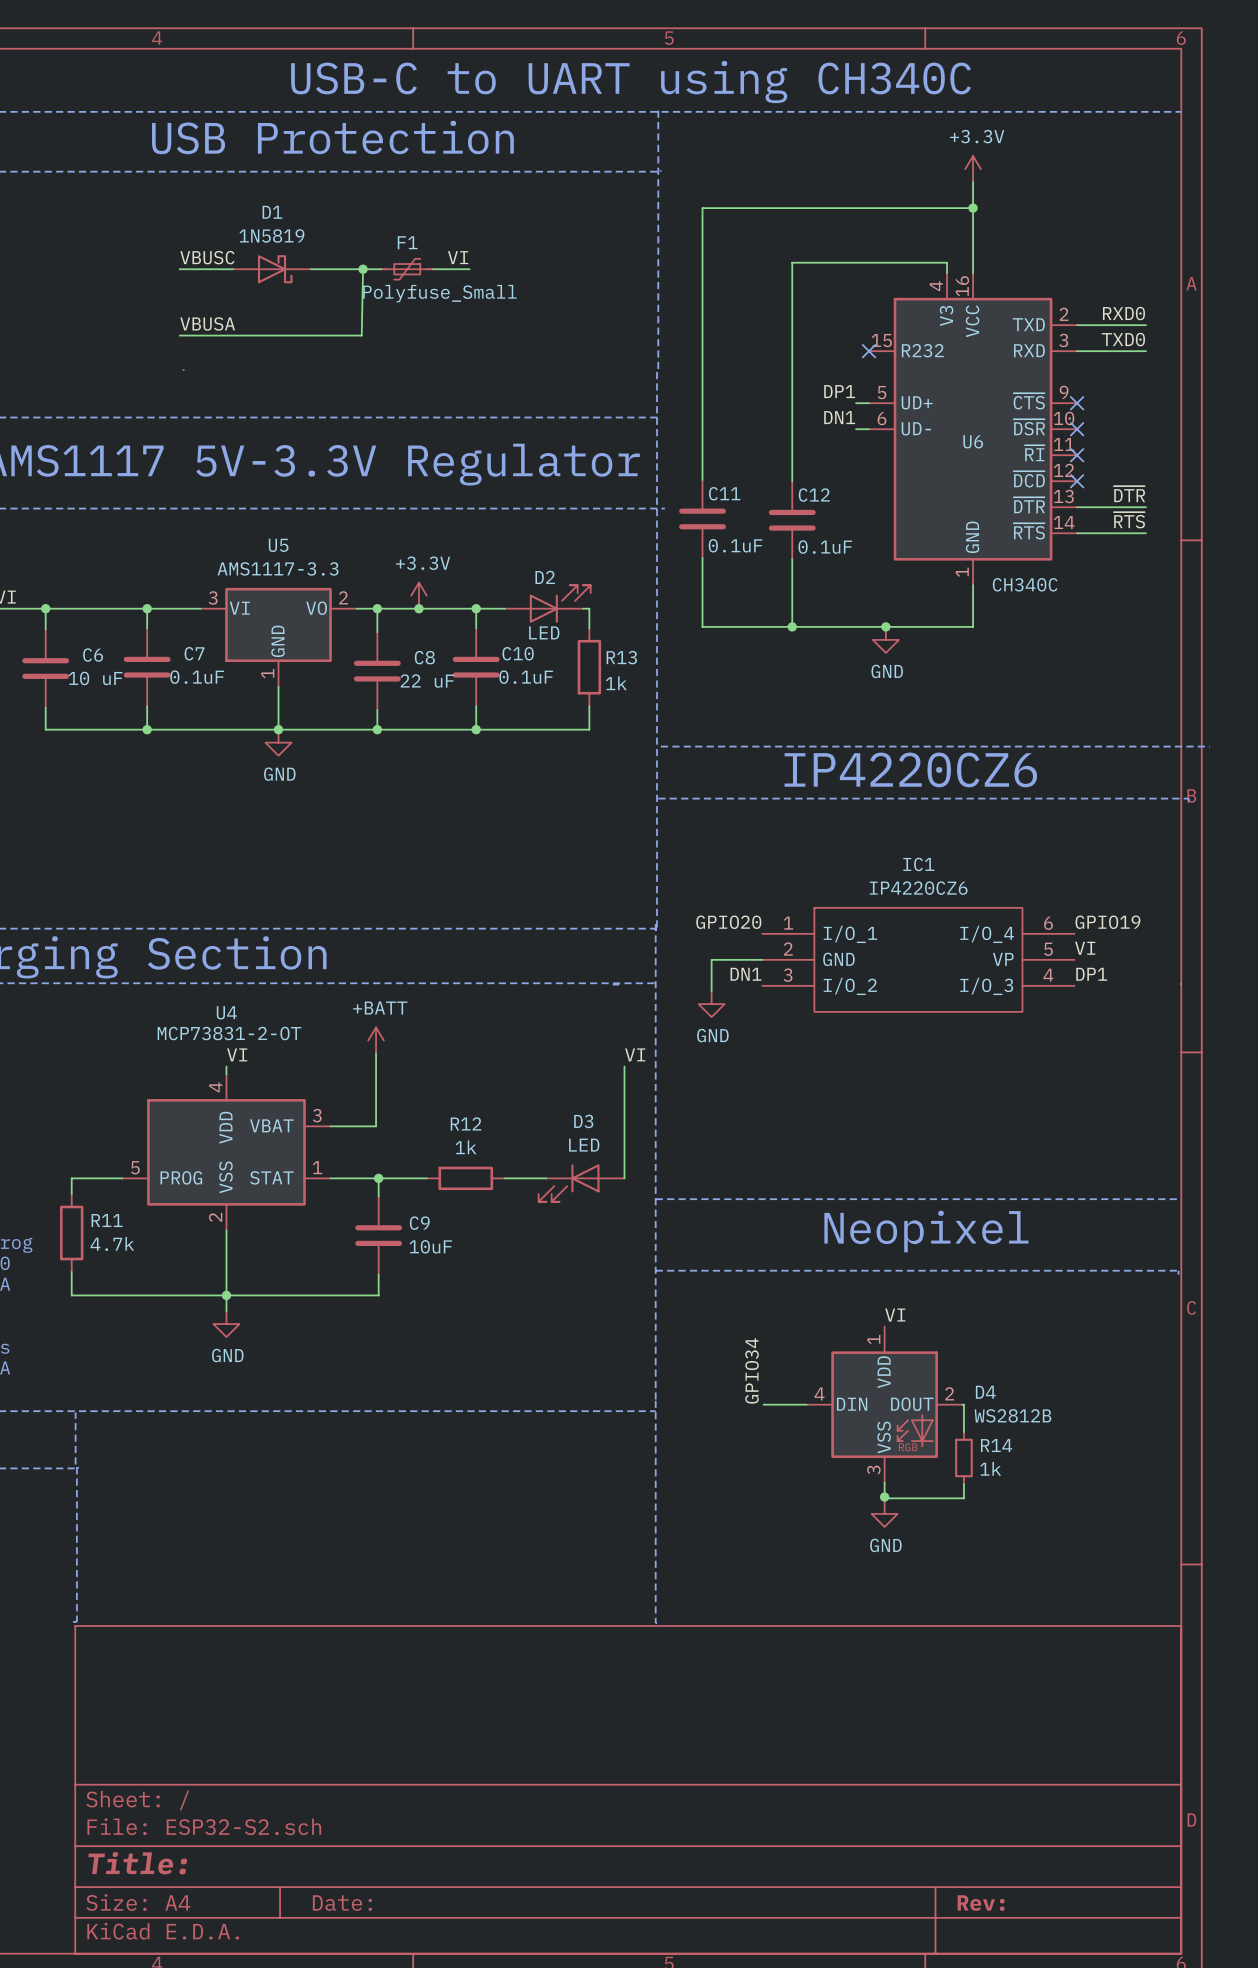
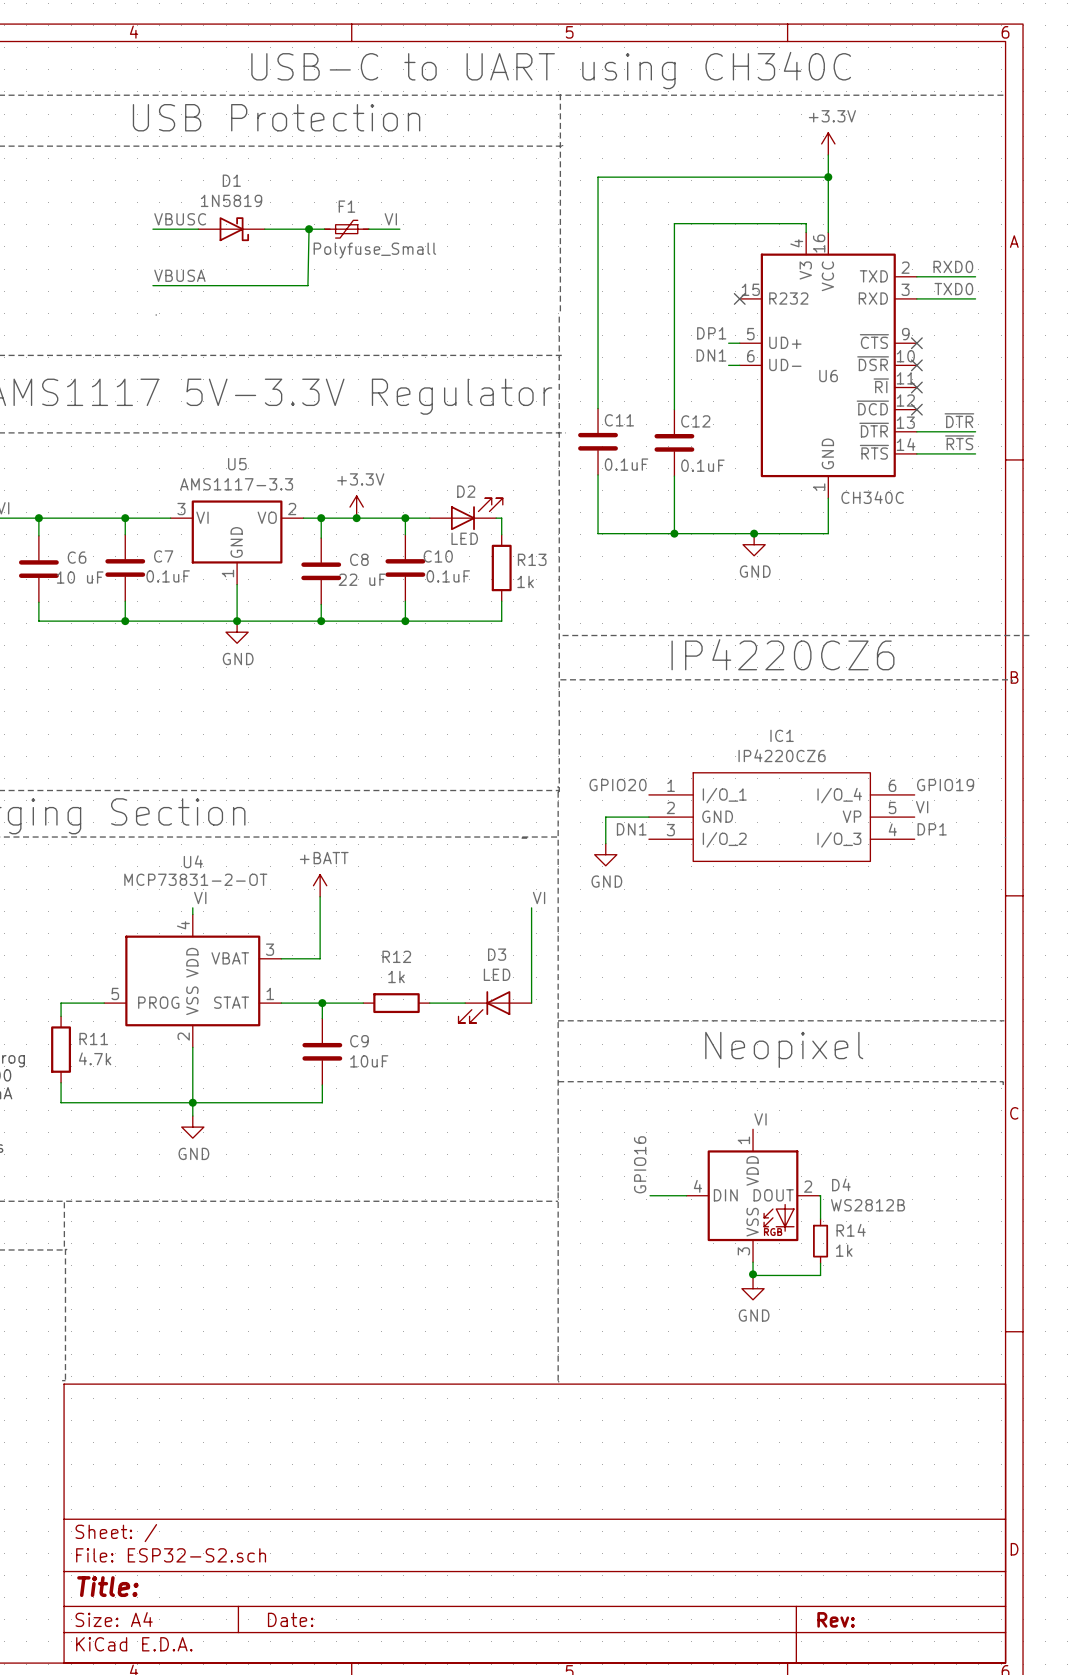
label: GPIO34 (752, 1370) -> GPIO16 (640, 1164)

